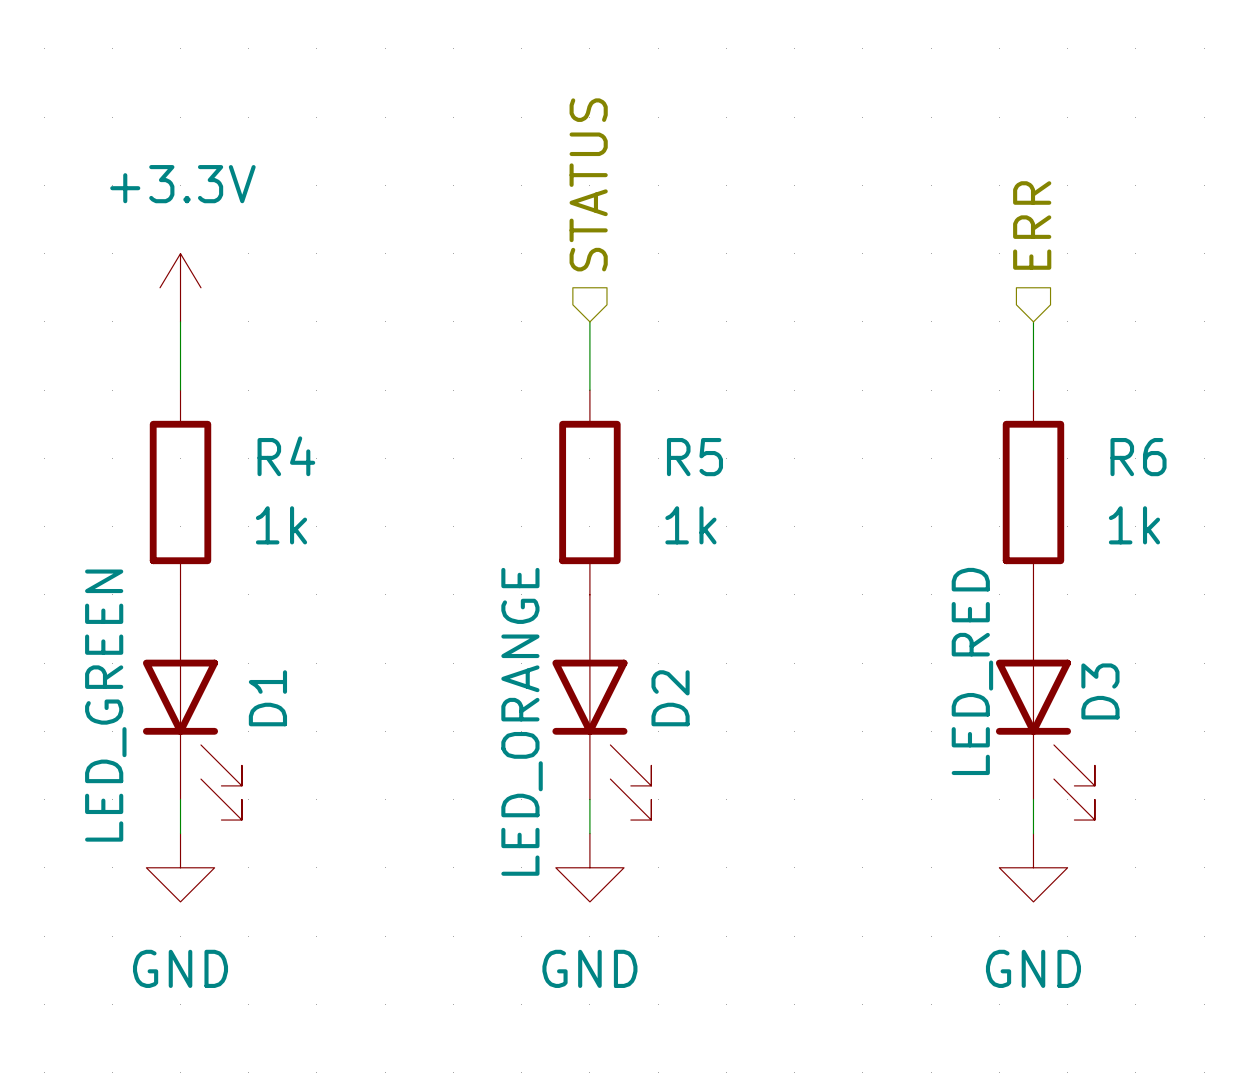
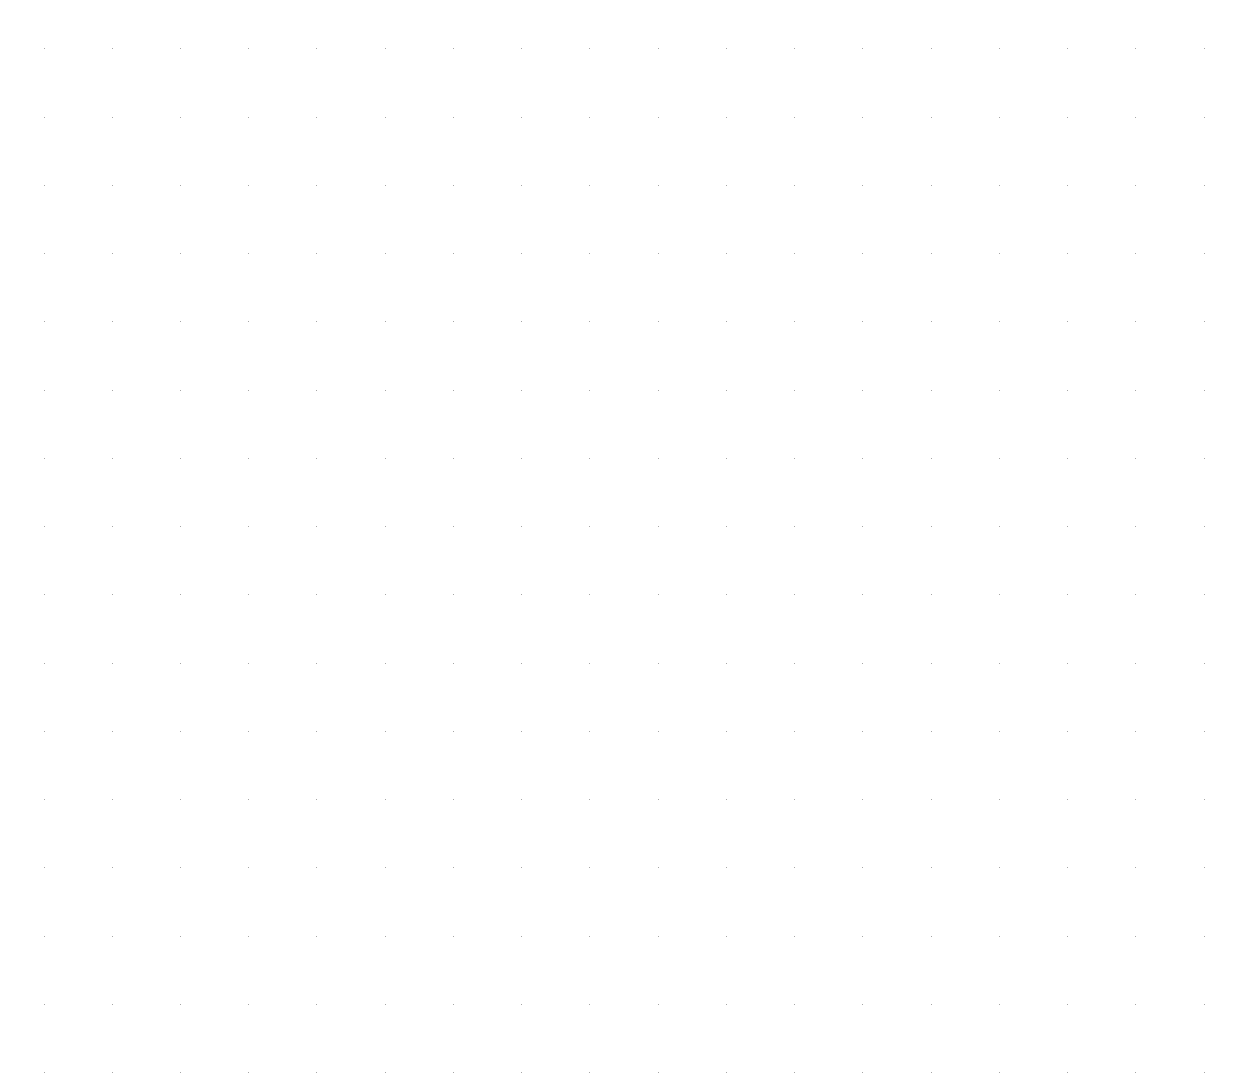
hierarchical label: STATUS (588, 184) -> none
hierarchical label: ERR (1032, 225) -> none
power symbol: +3.3V (180, 287) -> none
wire: (180, 321) (180, 390) -> none
wire: (589, 321) (589, 390) -> none
wire: (1033, 321) (1033, 390) -> none
R4: 1k (180, 492) -> none
R5: 1k (589, 492) -> none
R6: 1k (1033, 492) -> none
D1: LED_GREEN (192, 707) -> none
D2: LED_ORANGE (601, 707) -> none
D3: LED_RED (1045, 707) -> none
wire: (180, 799) (180, 833) -> none
wire: (589, 799) (589, 833) -> none
wire: (1033, 799) (1033, 833) -> none
power symbol: GND (180, 867) -> none
power symbol: GND (589, 867) -> none
power symbol: GND (1033, 867) -> none

